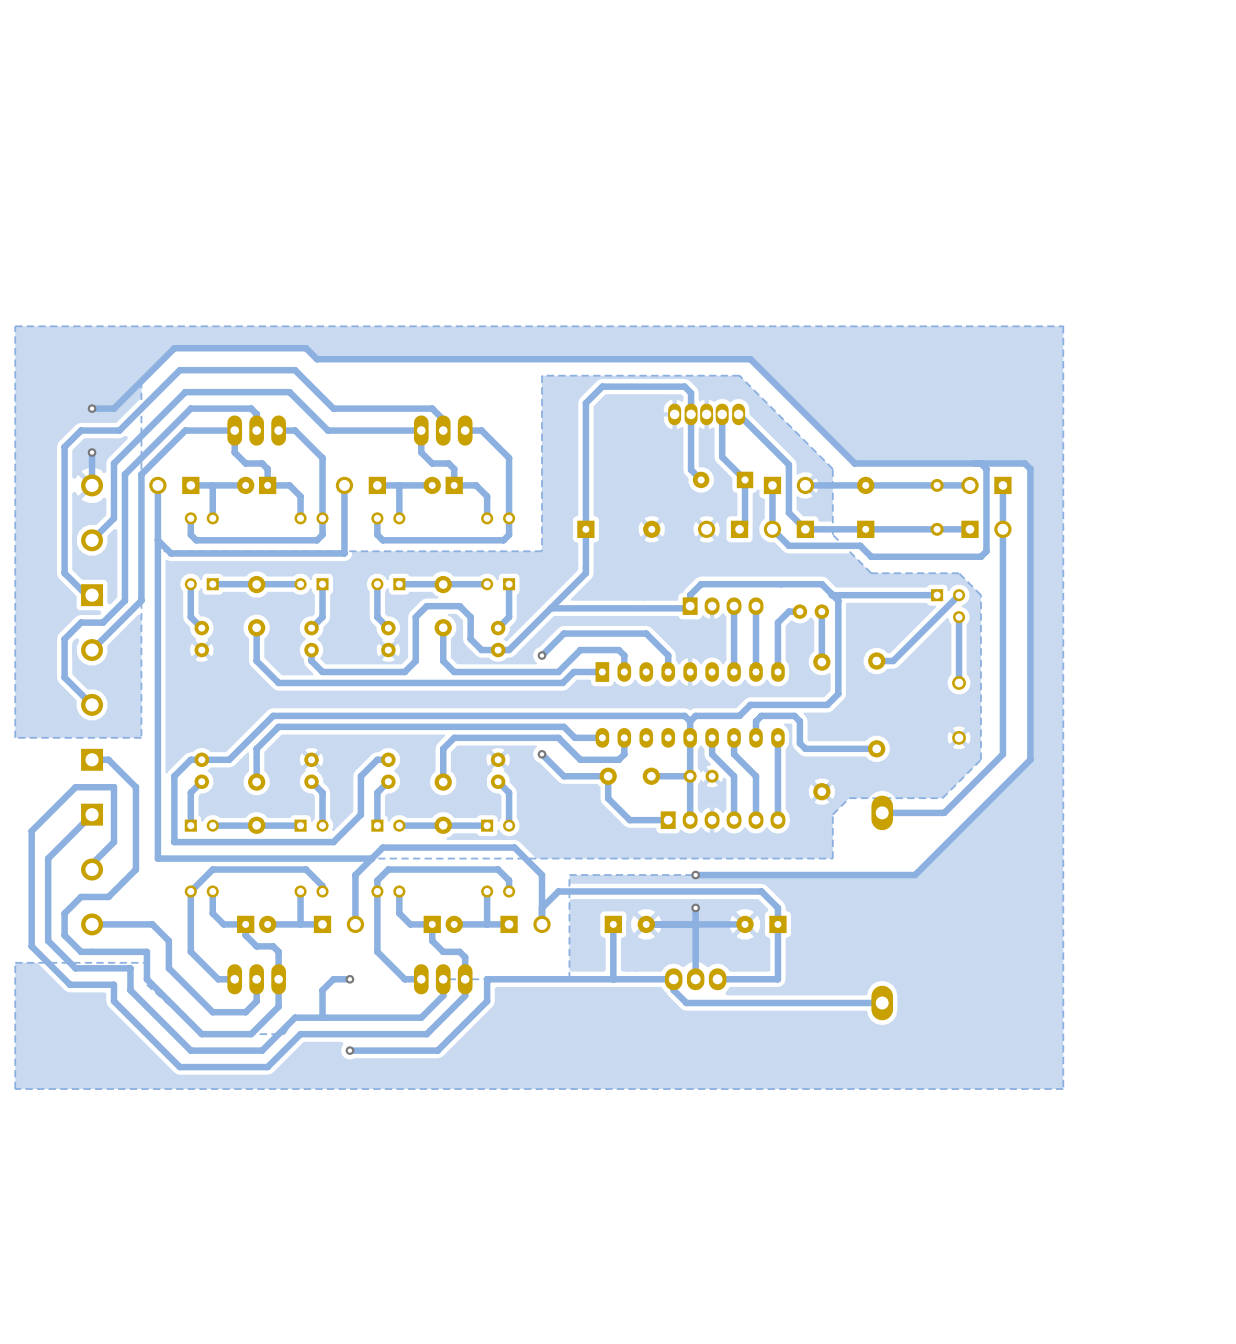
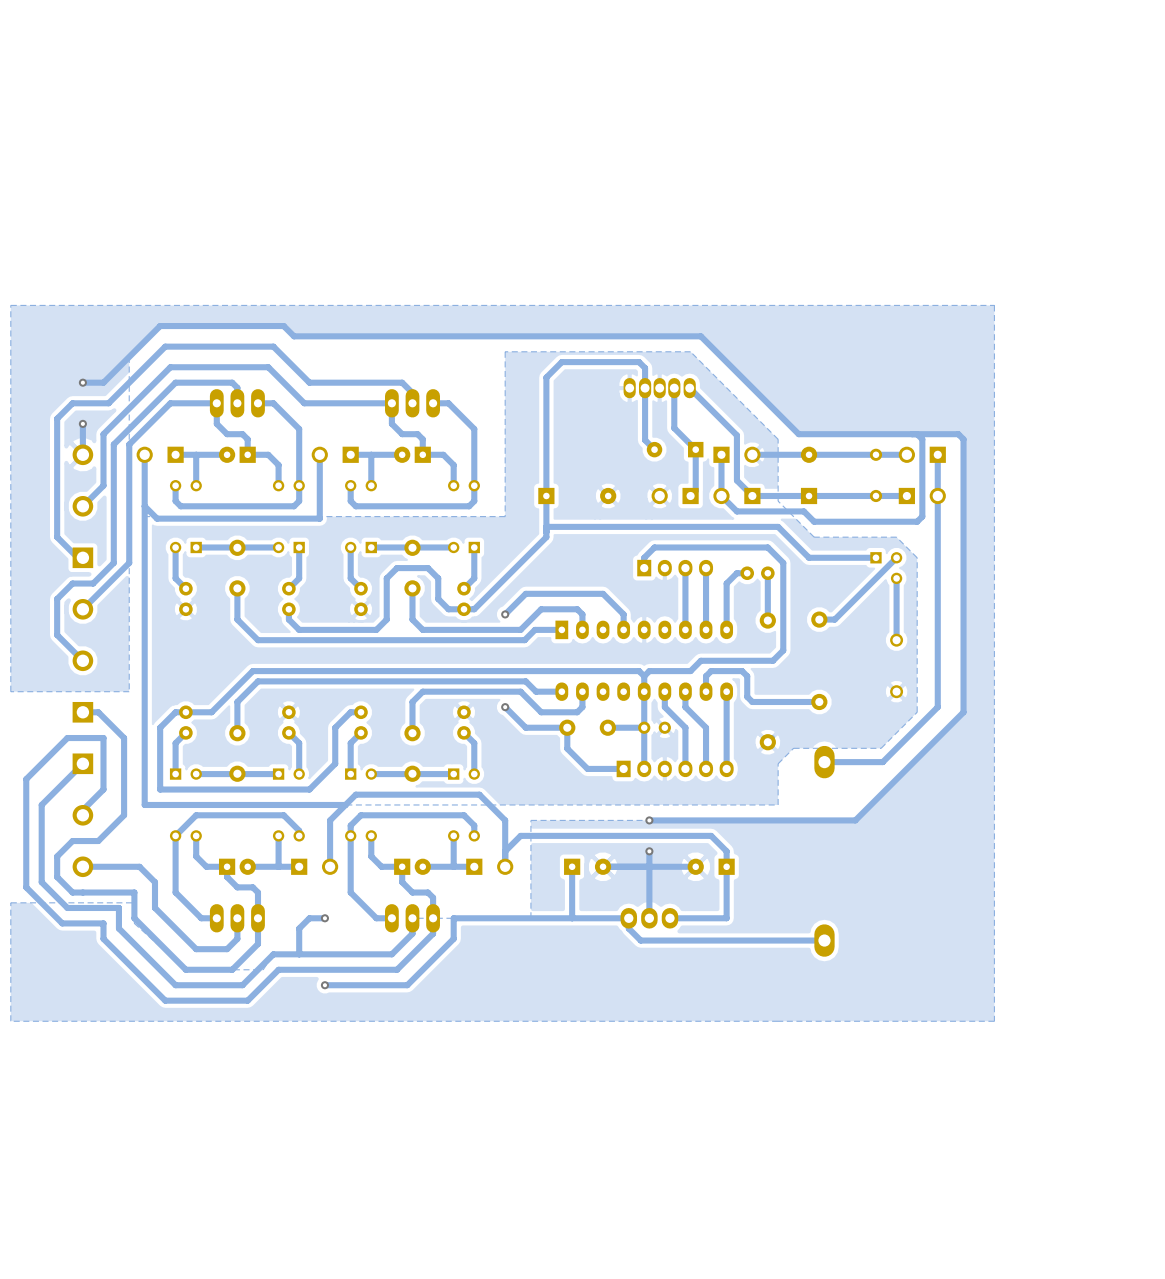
track: (831, 594) (865, 595) -> (546, 526) (778, 526) (809, 557)
track: (690, 606) (687, 608) (550, 608) -> none

